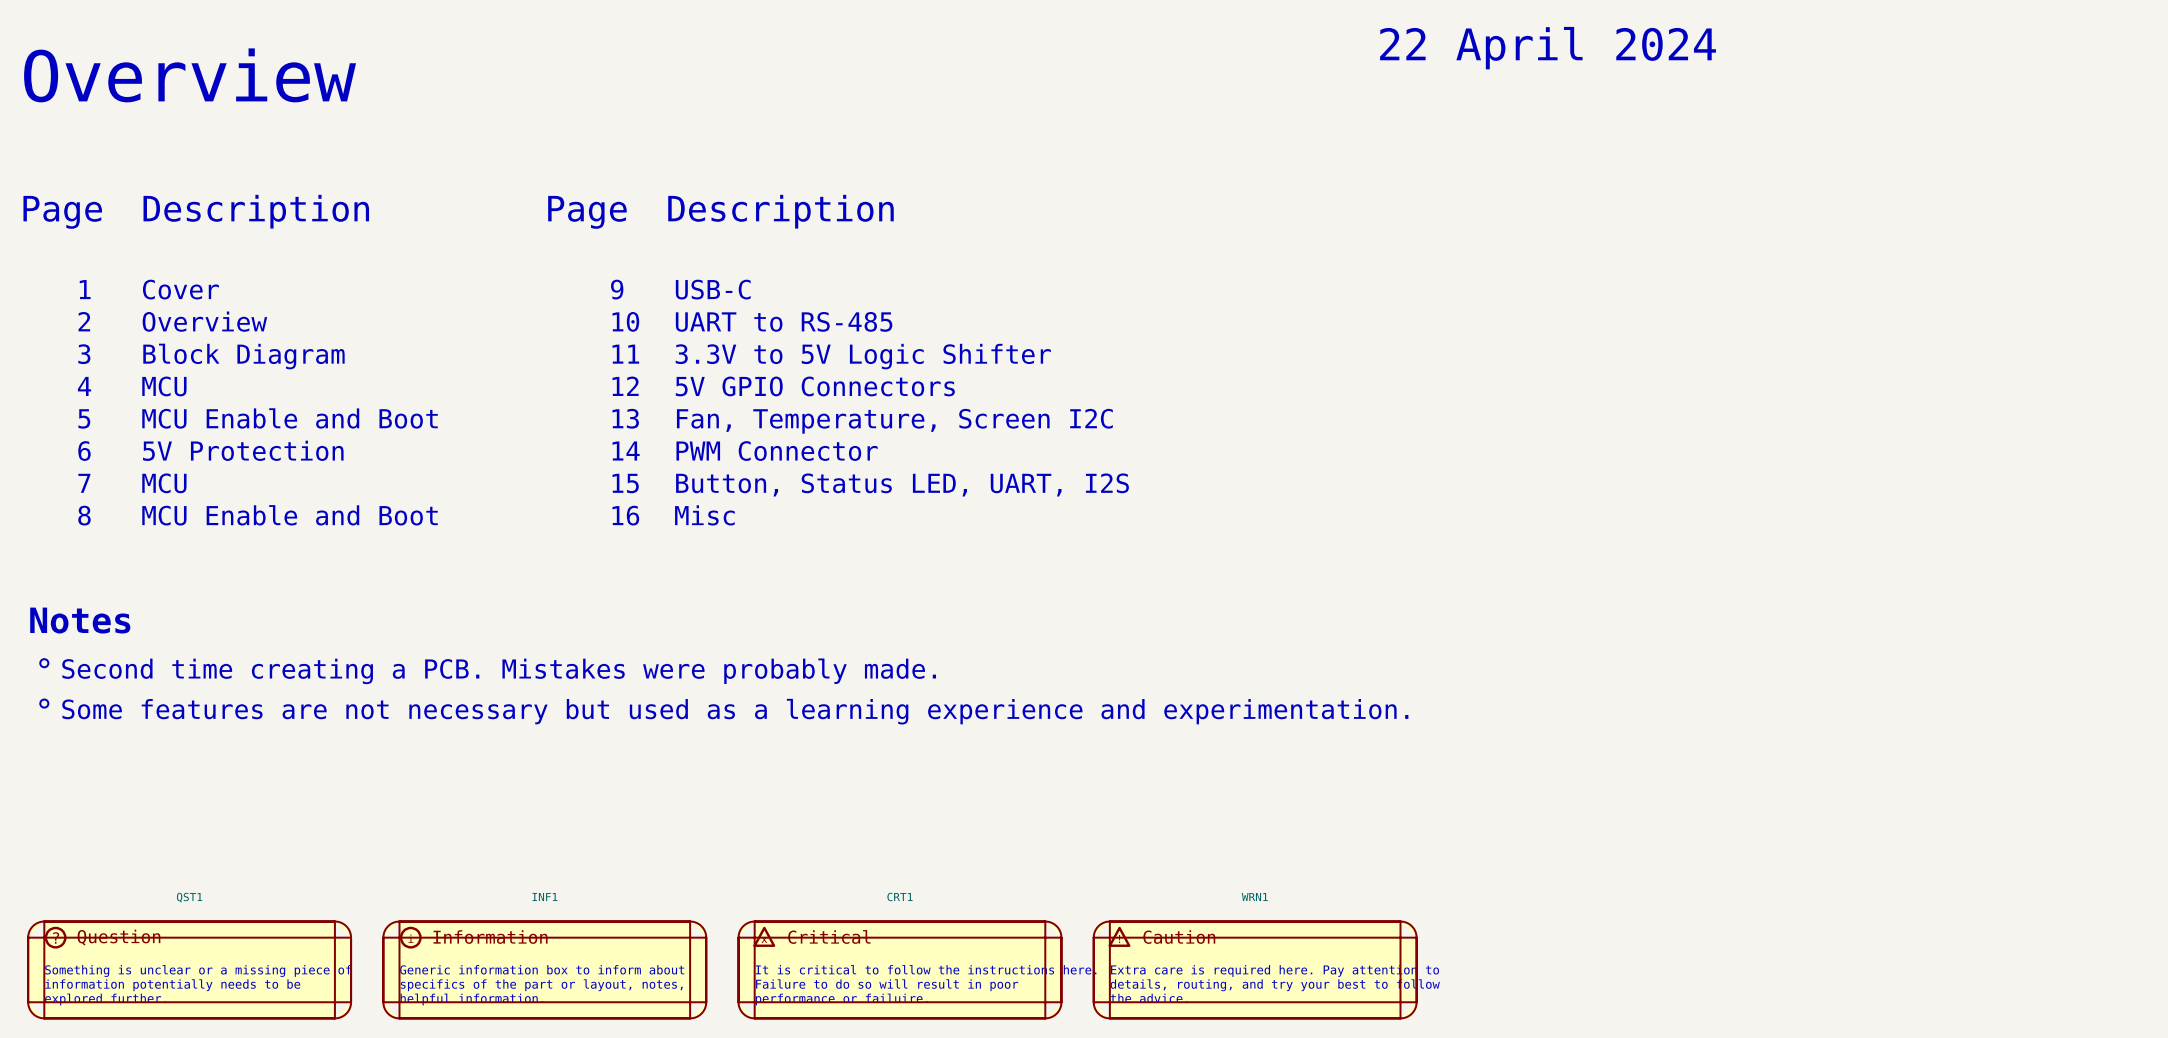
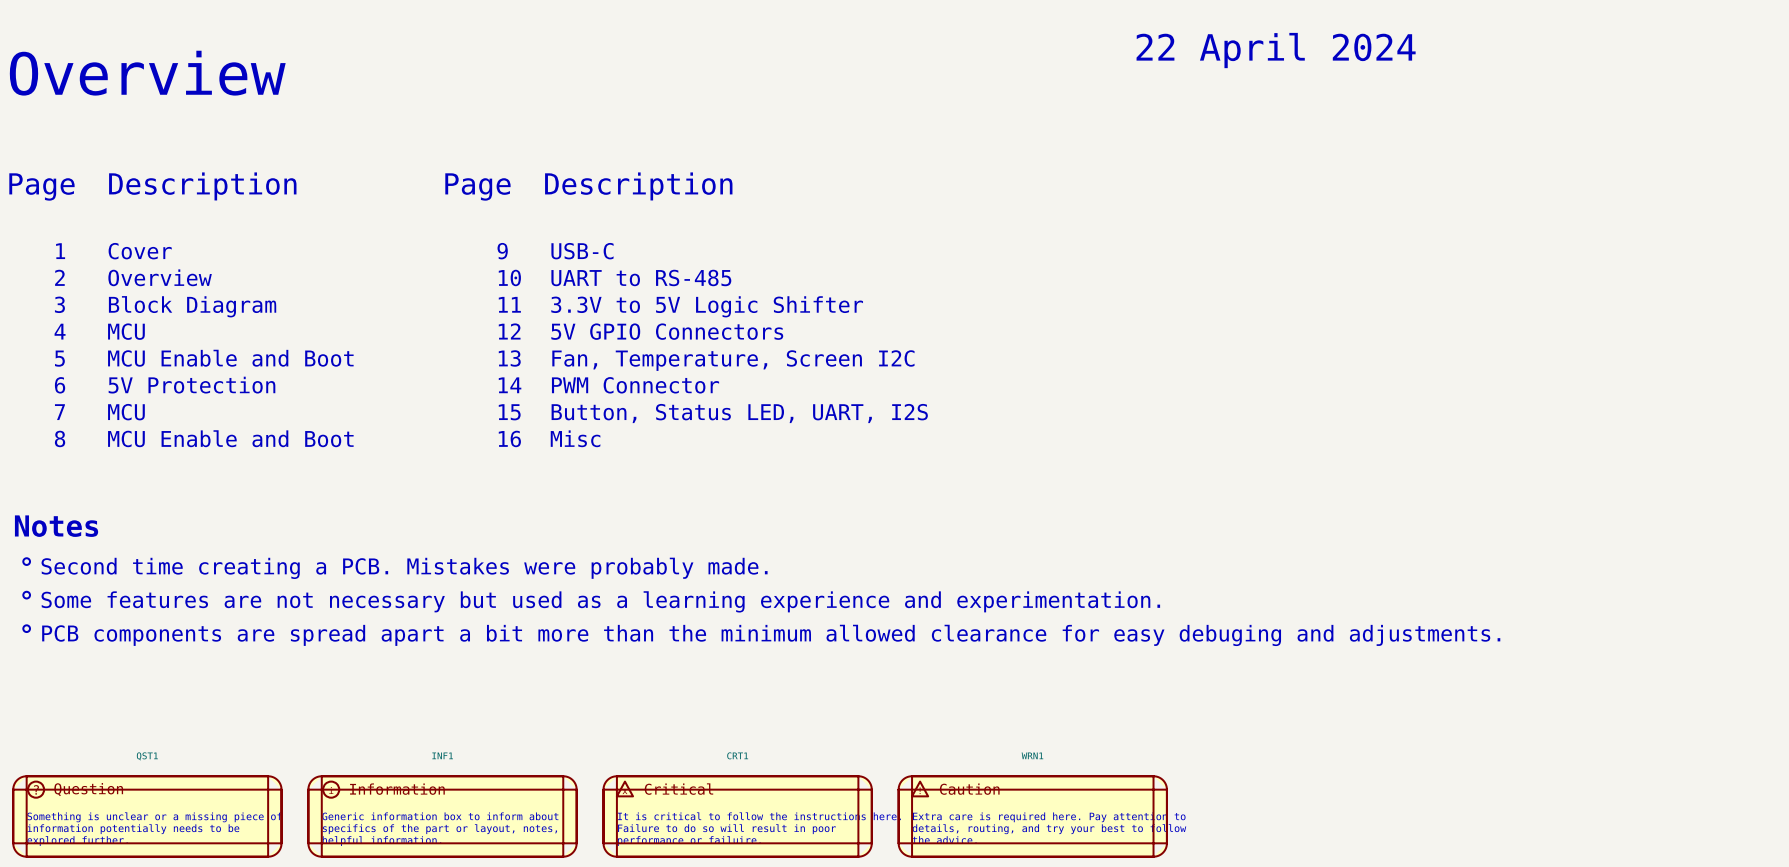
drawing: none -> [23, 625, 31, 633]
text: none -> PCB components are spread apart a bit more than the minimum allowed clearance for easy debuging and adjustments. (771, 635)

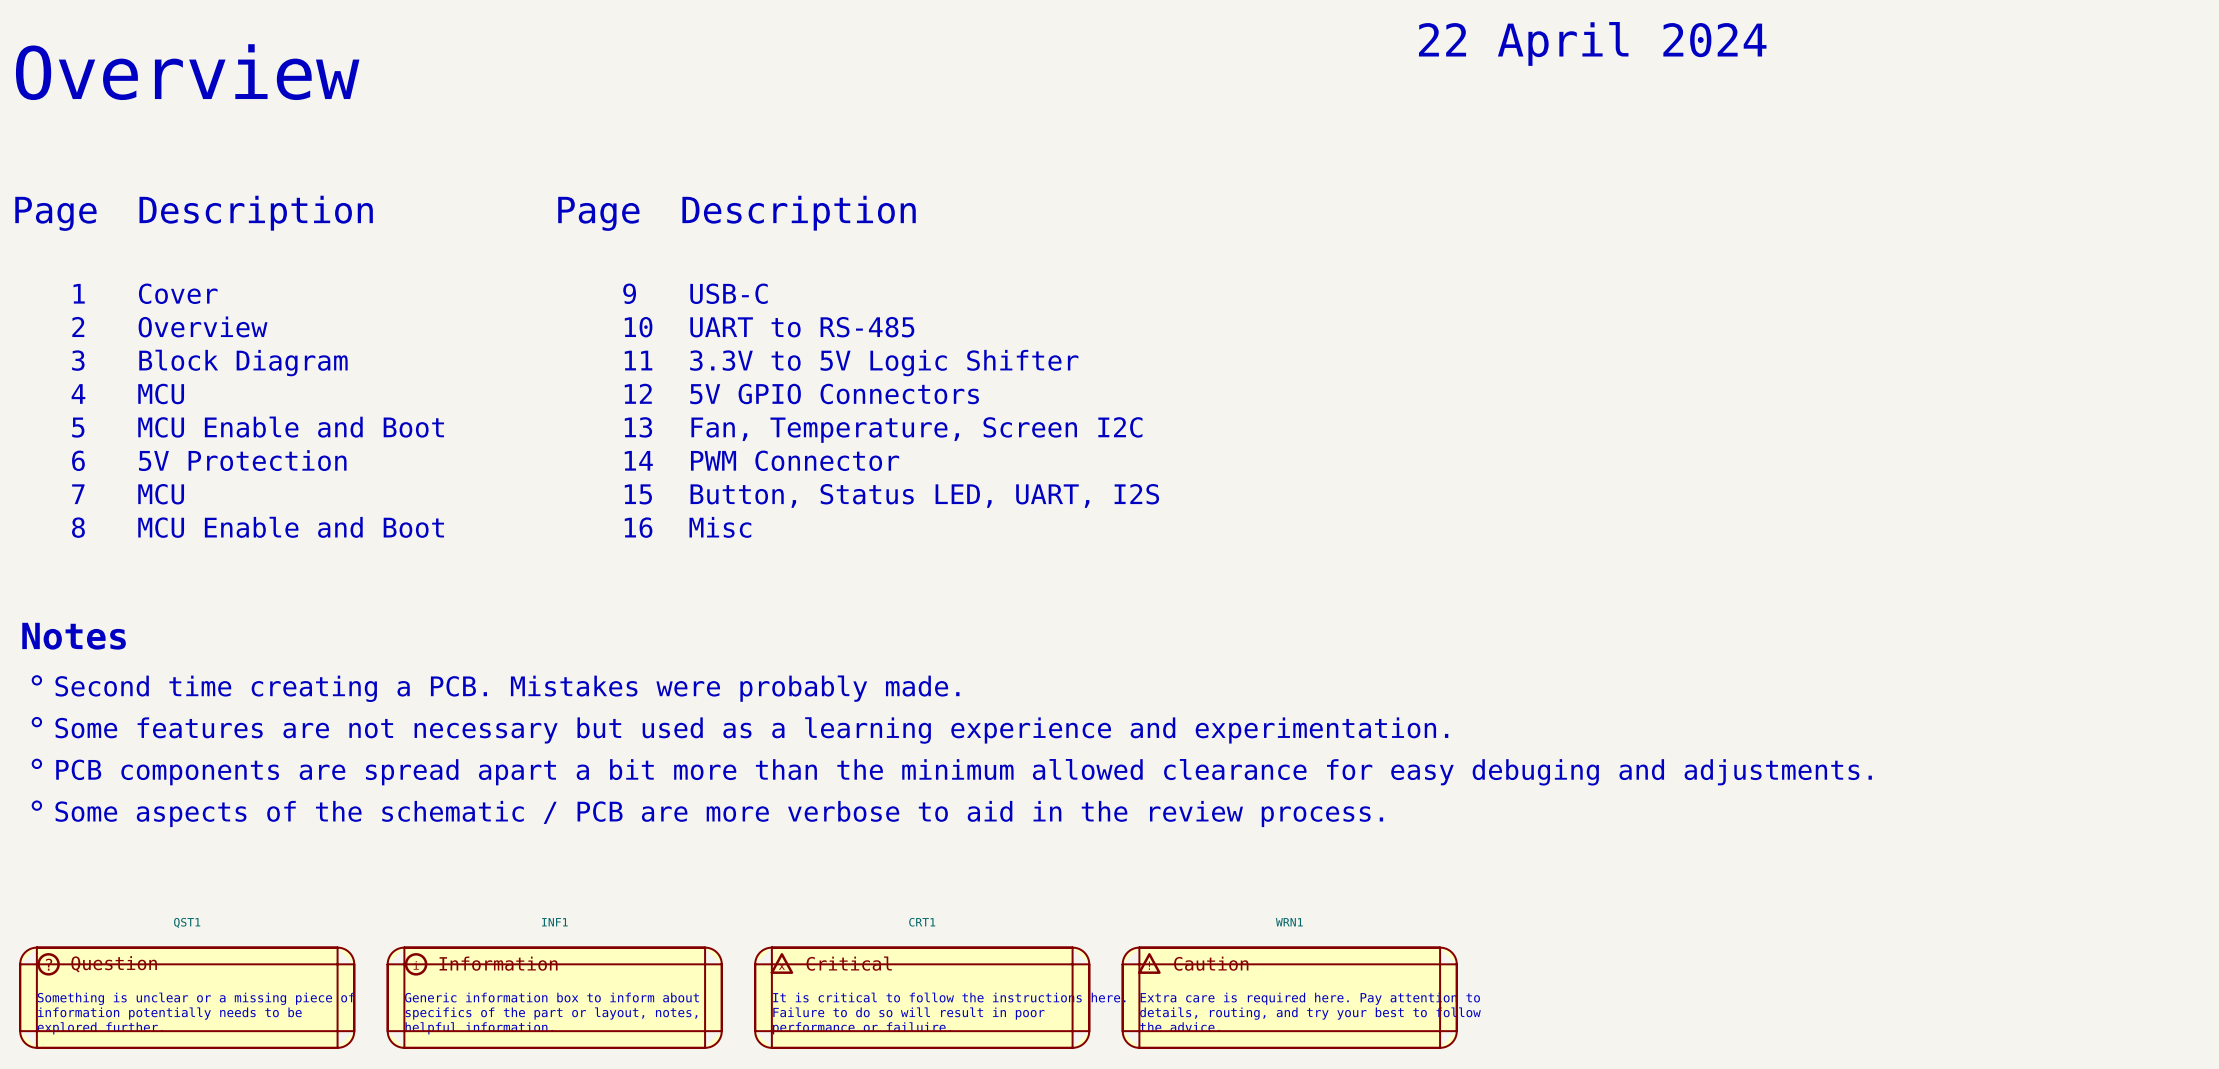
drawing: none -> [32, 801, 42, 810]
text: none -> Some aspects of the schematic / PCB are more verbose to aid in the review process. (719, 814)

